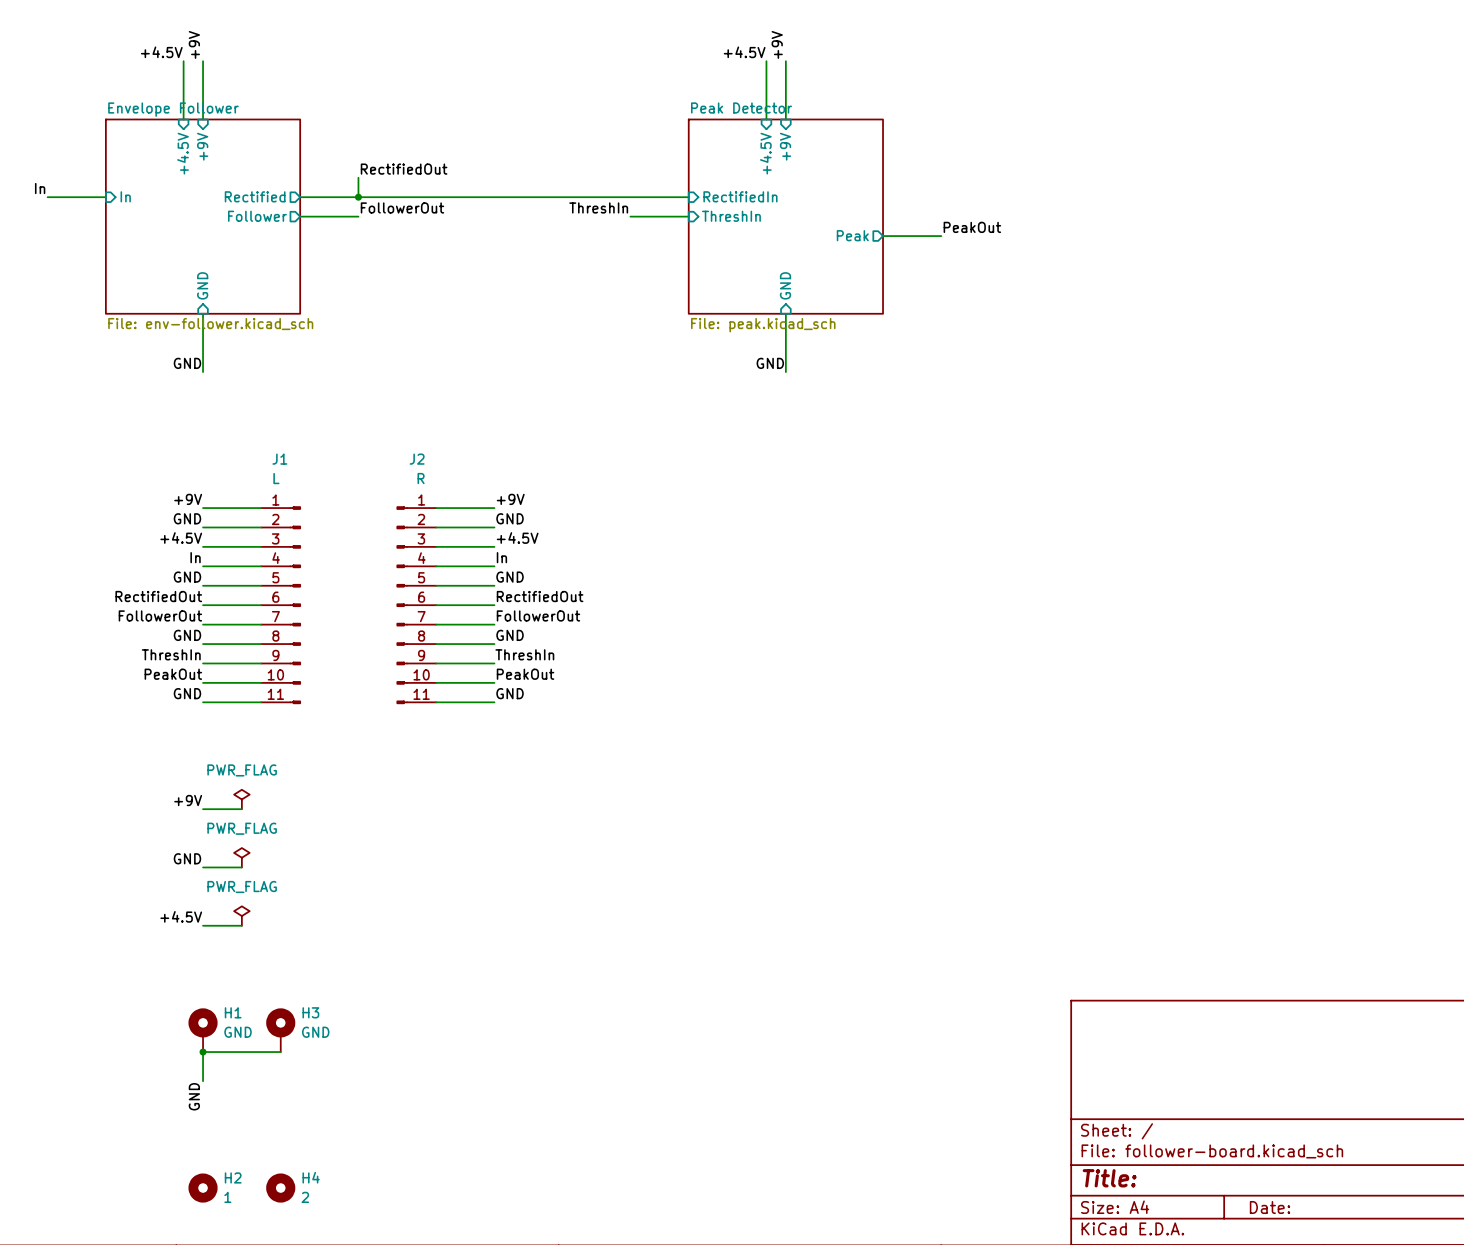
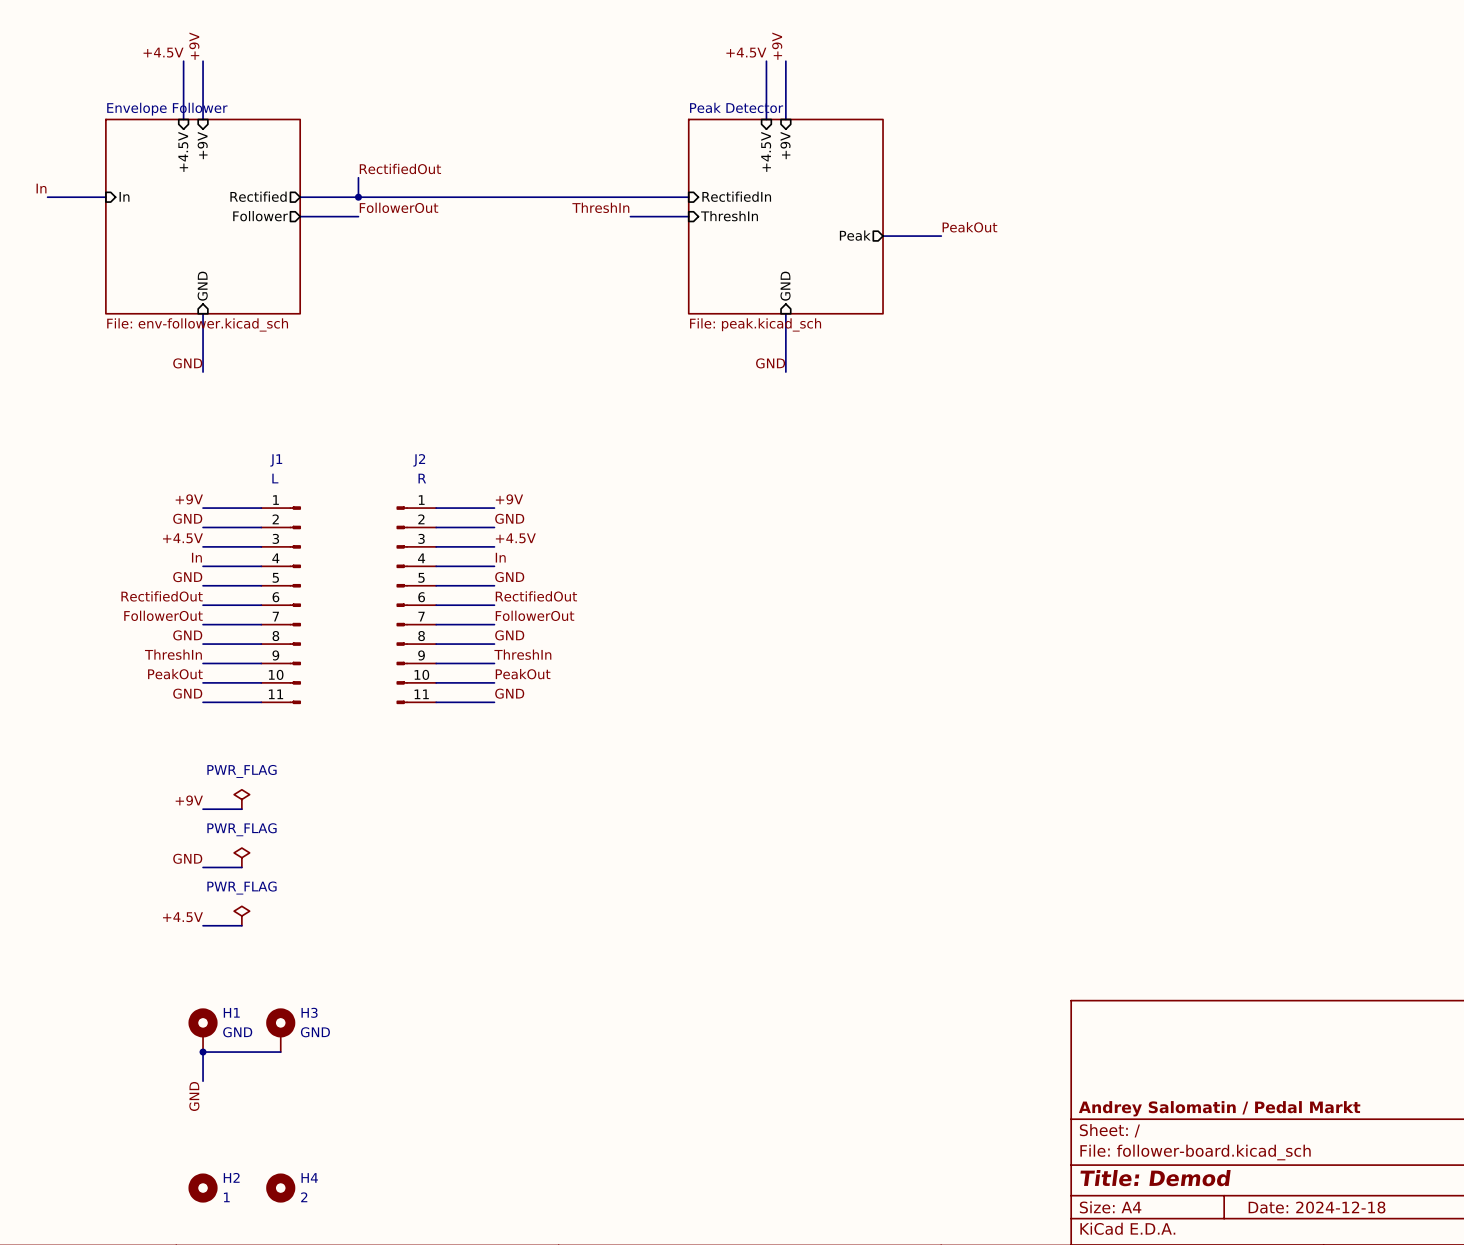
title block: none -> Andrey Salomatin / Pedal Markt (1219, 1108)
title block: Title: (1109, 1178) -> Title: Demod (1155, 1178)
title block: Date: (1269, 1207) -> Date: 2024-12-18 (1317, 1207)

